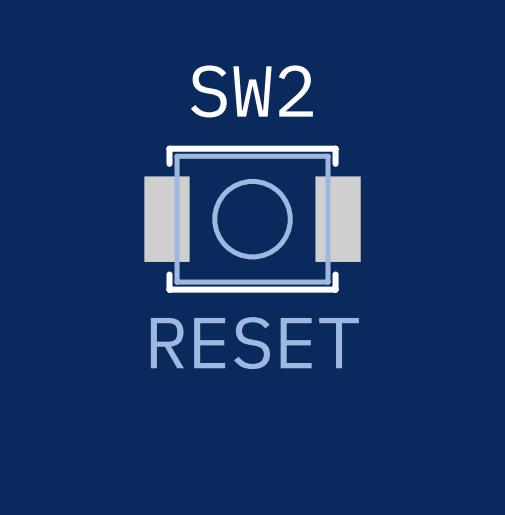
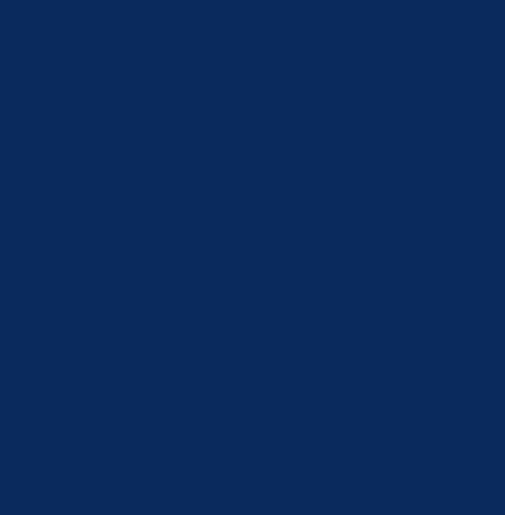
SW2: RESET (252, 219) -> none

